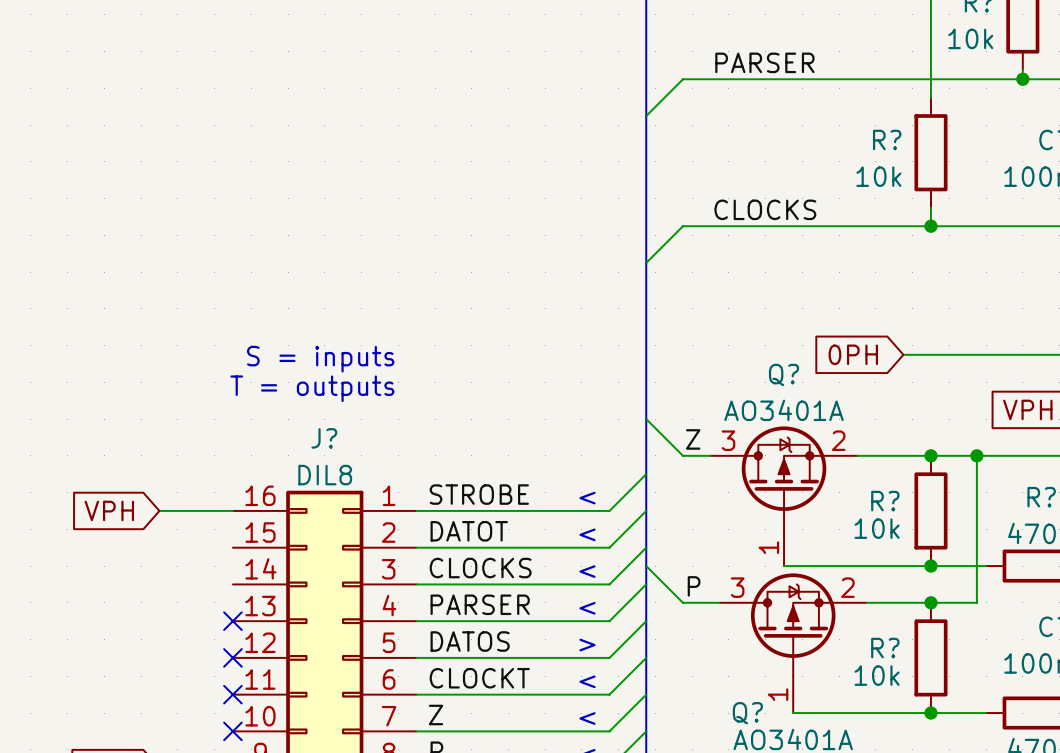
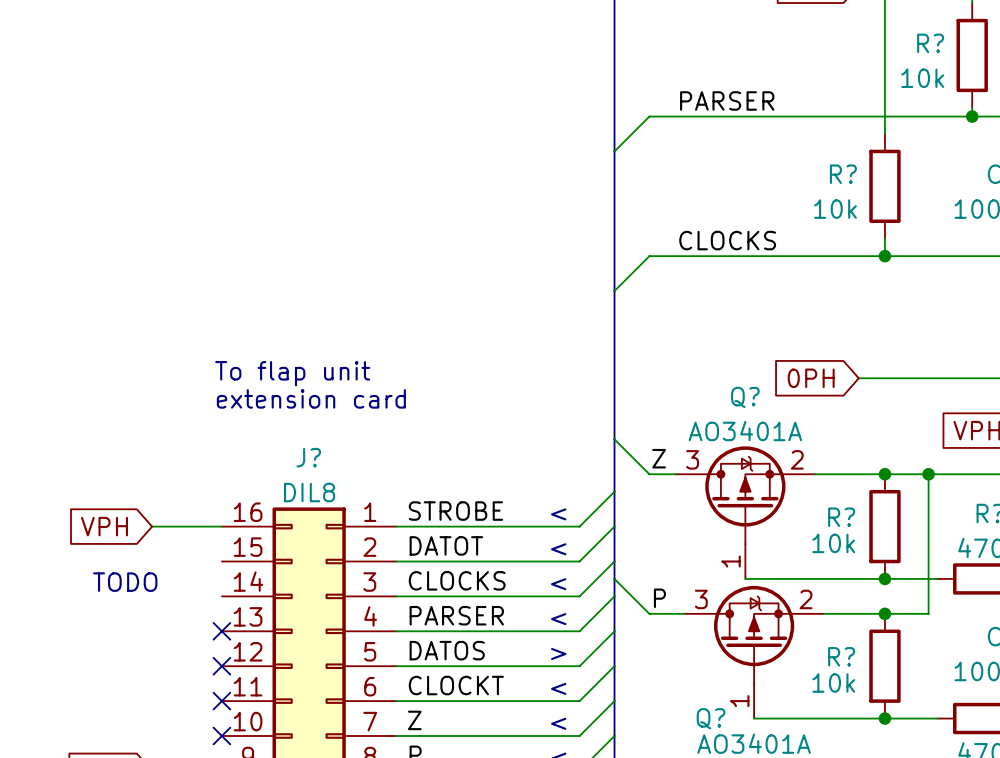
text: none -> To flap unit (292, 373)
text: S = inputs (320, 359) -> none
text: none -> extension card (311, 398)
text: T = outputs (312, 388) -> none
text: none -> TODO (125, 582)

